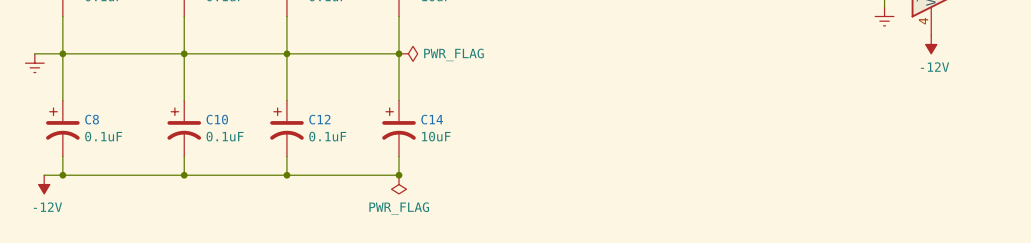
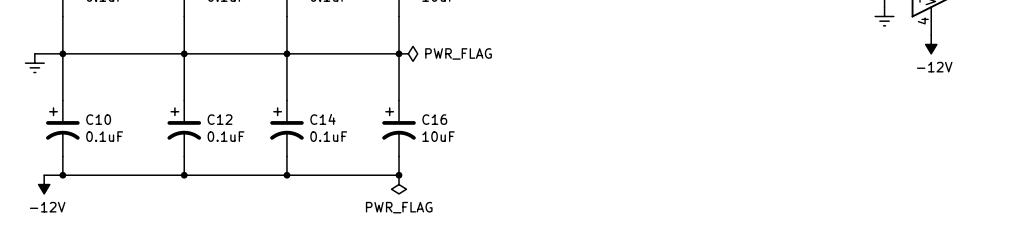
C8 name: C8 (92, 119) -> C10 (98, 119)
C10 name: C10 (217, 119) -> C12 (220, 119)
C12 name: C12 (319, 119) -> C14 (322, 119)
C14 name: C14 (432, 119) -> C16 (434, 119)

